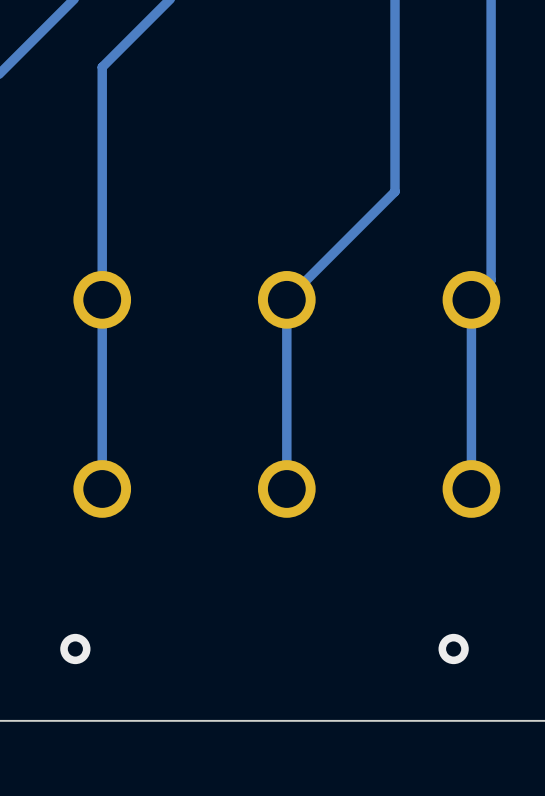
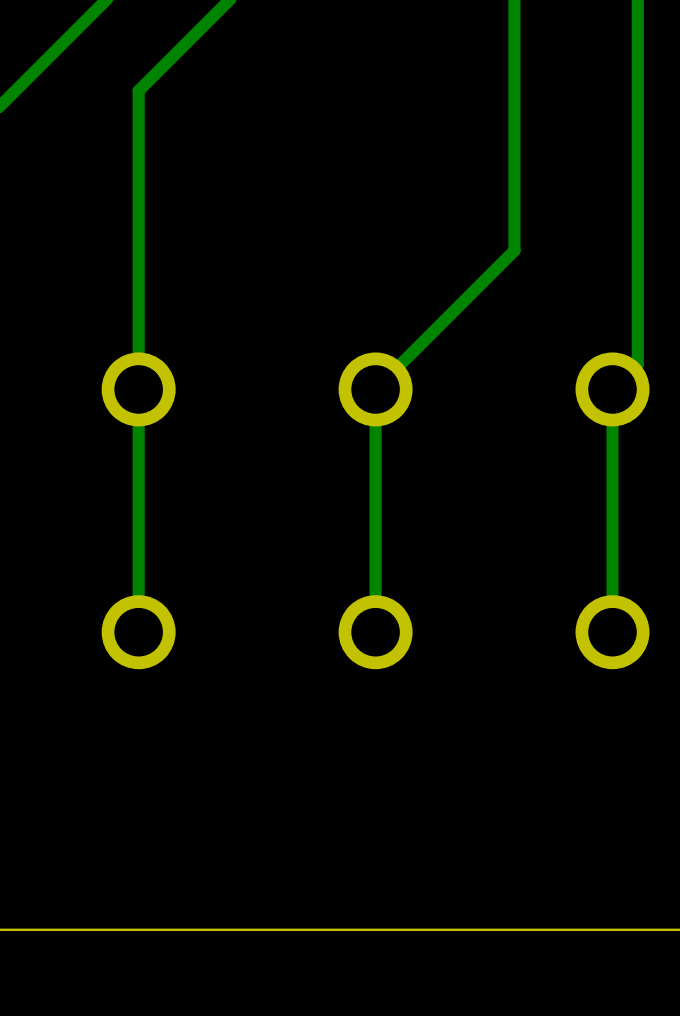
via: (75, 648) -> none
via: (453, 648) -> none

